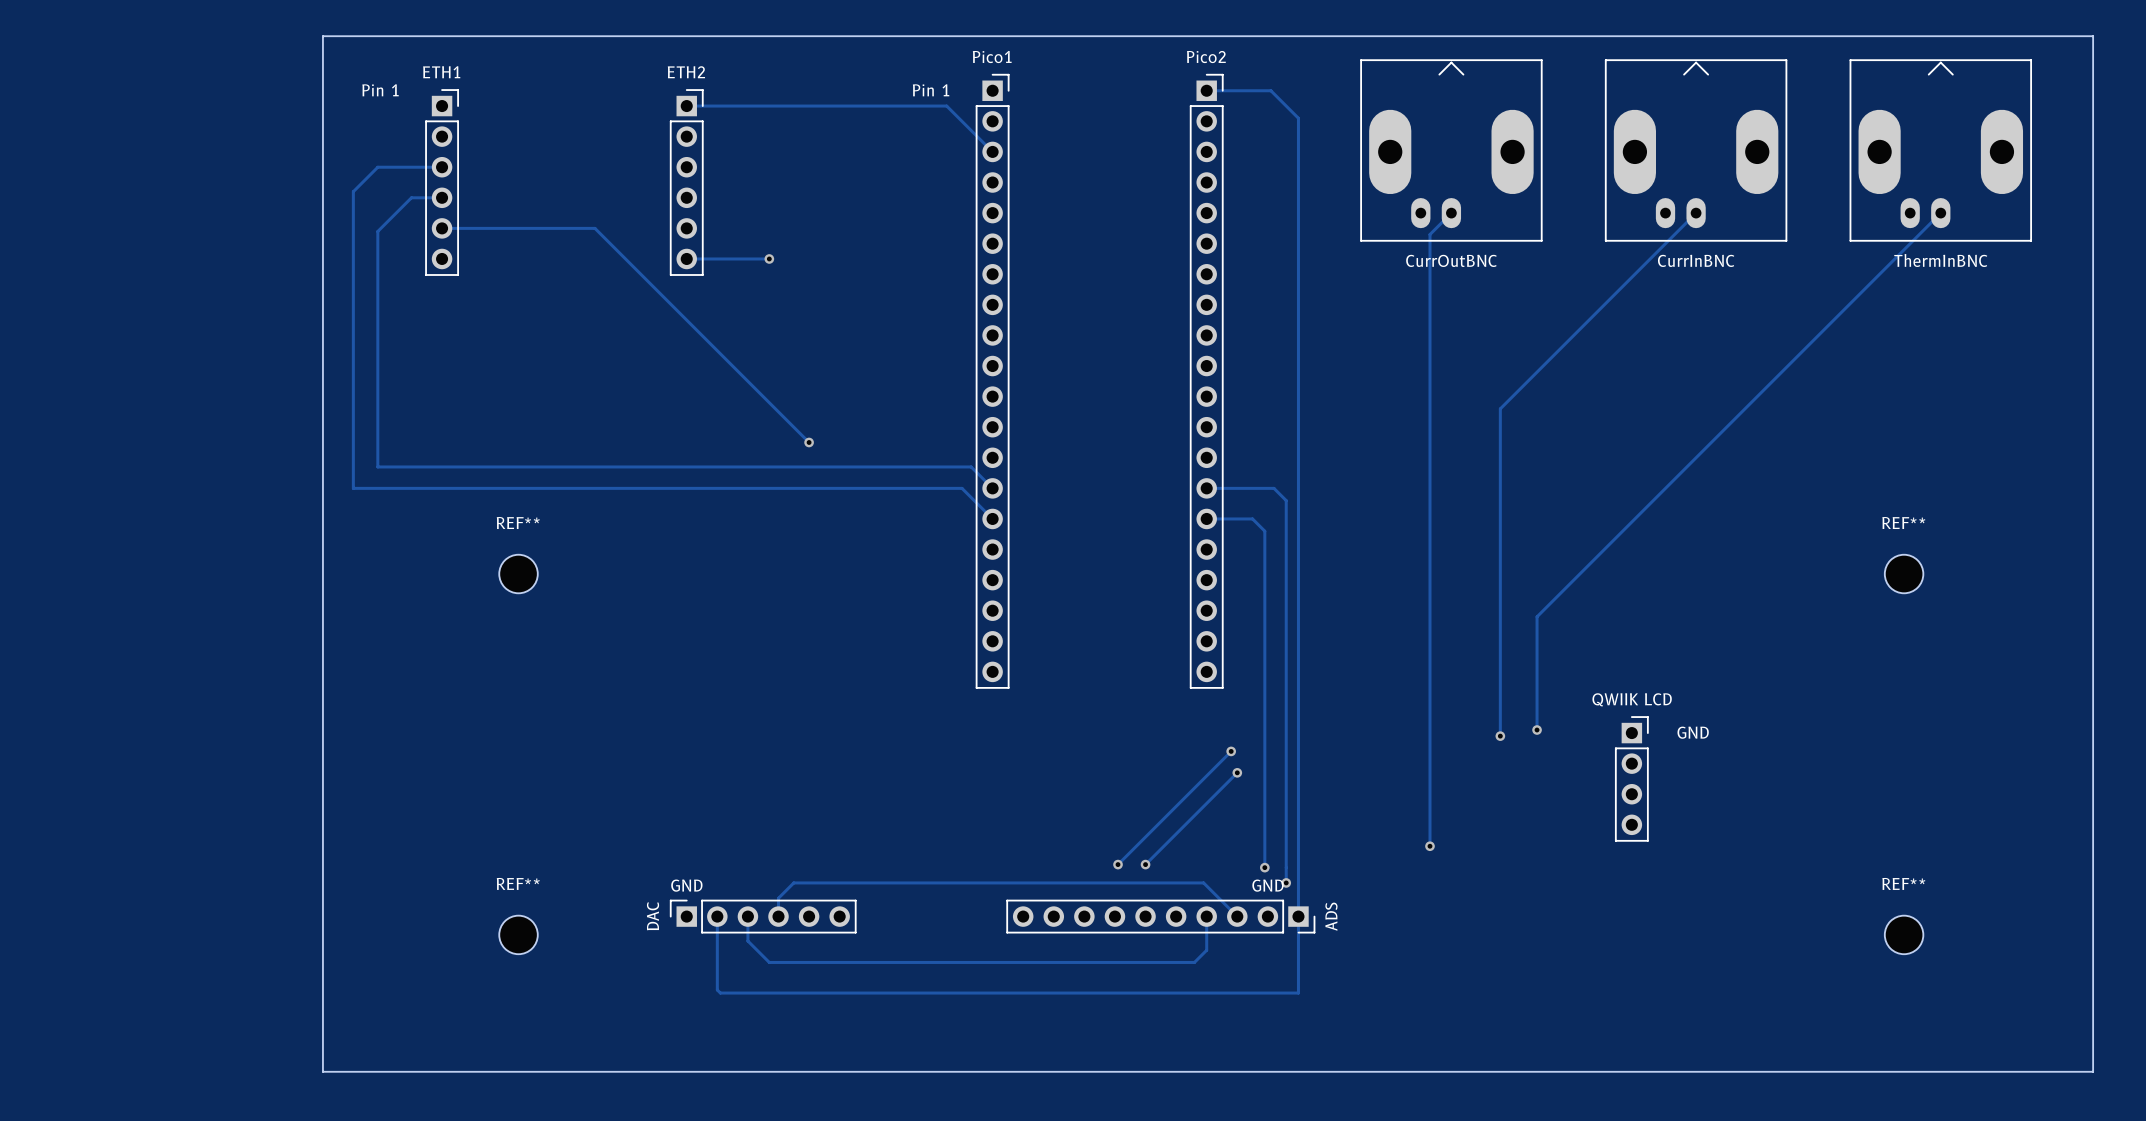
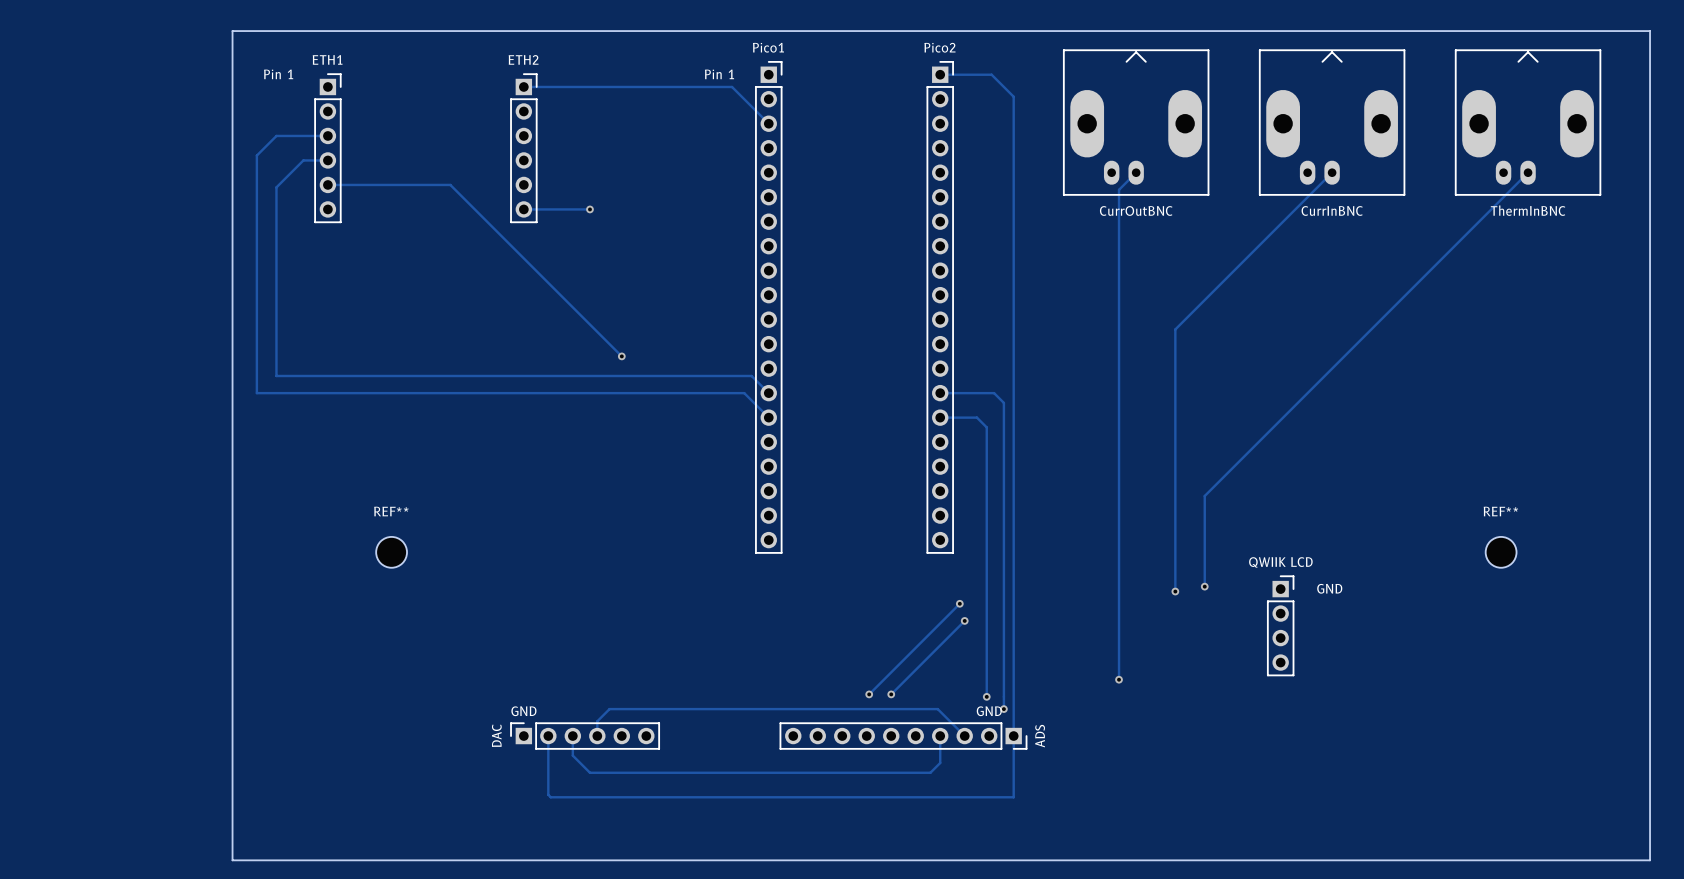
REF** position: (518, 574) -> (391, 552)
REF** position: (1904, 574) -> (1501, 552)
REF**: (518, 934) -> none
REF**: (1904, 934) -> none

